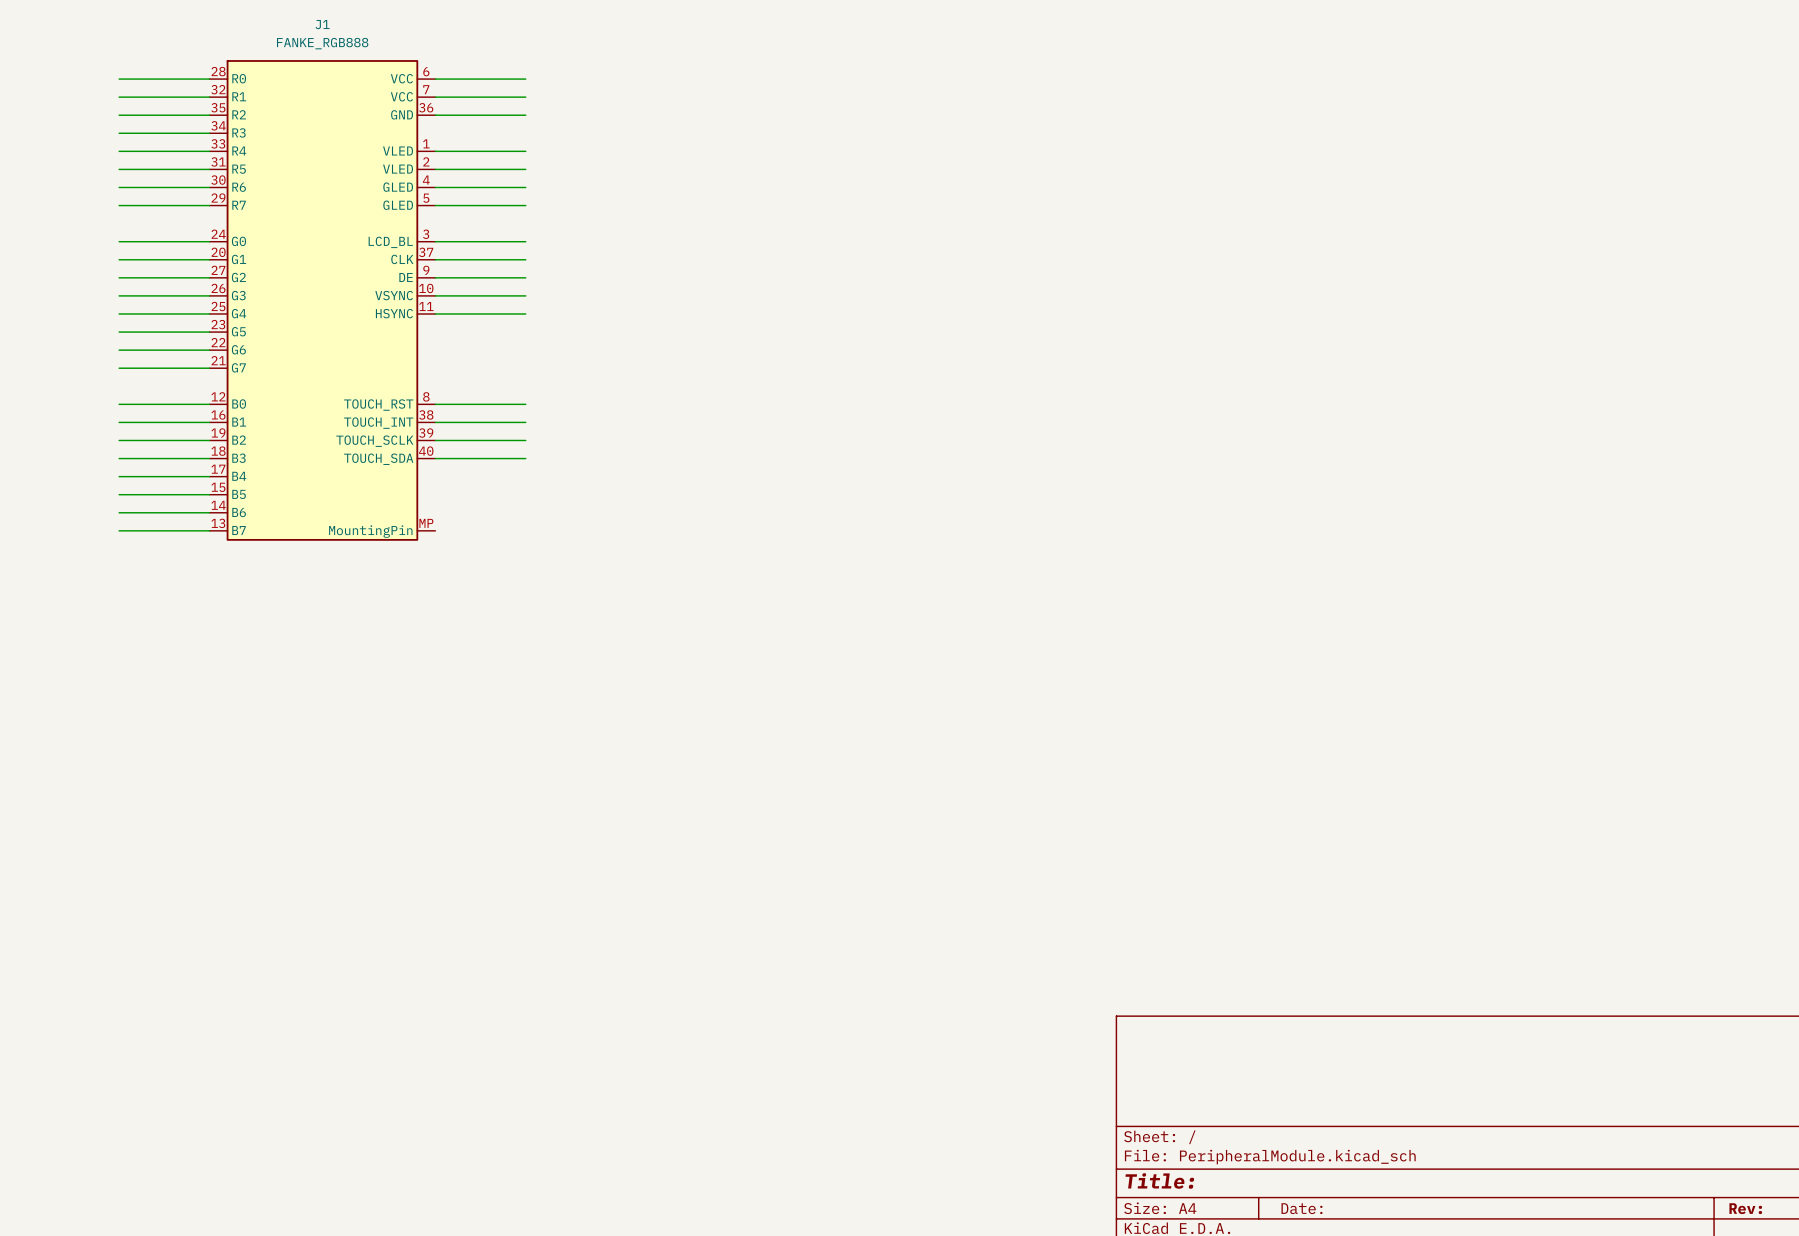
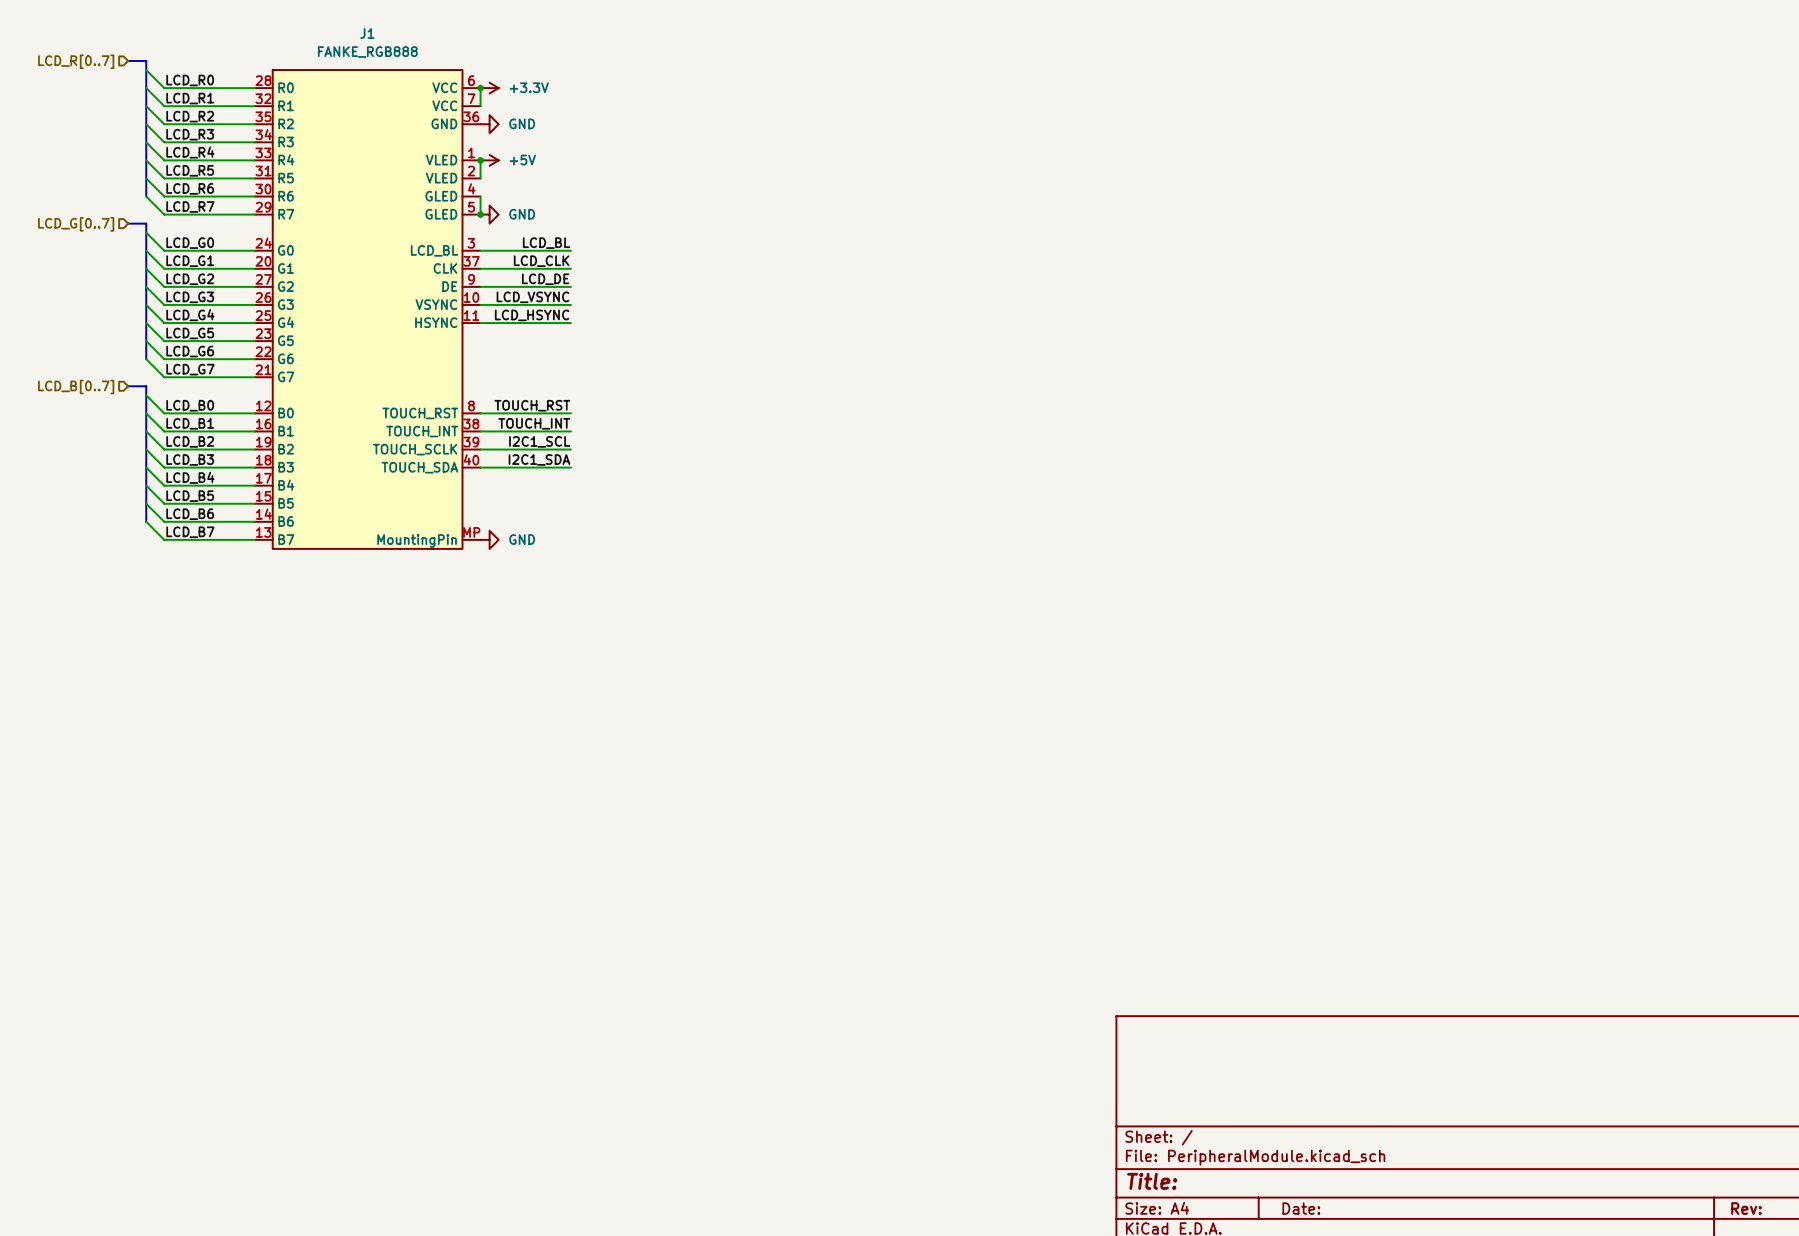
bus: none -> (128, 60) (146, 60) (146, 196)
hierarchical label: none -> LCD_R[0..7] (76, 61)
wire: none -> (146, 70) (164, 88) (254, 88)
wire: (119, 79) (209, 79) -> none
wire: (435, 79) (525, 79) -> none
label: none -> LCD_R0 (190, 80)
wire: none -> (146, 88) (164, 106) (254, 106)
wire: none -> (480, 88) (480, 106)
junction: none -> (480, 88)
power symbol: none -> +3.3V (489, 88)
wire: (119, 97) (209, 97) -> none
wire: (435, 97) (525, 97) -> none
label: none -> LCD_R1 (190, 98)
wire: none -> (146, 106) (164, 124) (254, 124)
wire: (119, 115) (209, 115) -> none
wire: (435, 115) (525, 115) -> none
label: none -> LCD_R2 (190, 116)
wire: none -> (146, 124) (164, 142) (254, 142)
power symbol: none -> GND (489, 124)
wire: (119, 133) (209, 133) -> none
label: none -> LCD_R3 (190, 134)
wire: none -> (146, 142) (164, 160) (254, 160)
wire: (119, 151) (209, 151) -> none
wire: (435, 151) (525, 151) -> none
label: none -> LCD_R4 (190, 152)
wire: none -> (146, 160) (164, 178) (254, 178)
wire: none -> (480, 160) (480, 178)
junction: none -> (480, 160)
power symbol: none -> +5V (489, 160)
wire: (119, 169) (209, 169) -> none
wire: (435, 169) (525, 169) -> none
label: none -> LCD_R5 (190, 170)
wire: none -> (146, 178) (164, 196) (254, 196)
wire: (119, 187) (209, 187) -> none
wire: (435, 187) (525, 187) -> none
label: none -> LCD_R6 (190, 188)
wire: none -> (146, 196) (164, 214) (254, 214)
wire: none -> (480, 196) (480, 214)
wire: (119, 205) (209, 205) -> none
wire: (435, 205) (525, 205) -> none
label: none -> LCD_R7 (190, 206)
junction: none -> (480, 214)
power symbol: none -> GND (489, 214)
hierarchical label: none -> LCD_G[0..7] (76, 224)
bus: none -> (128, 223) (146, 223) (146, 359)
wire: none -> (146, 232) (164, 250) (254, 250)
wire: (119, 241) (209, 241) -> none
wire: (435, 241) (525, 241) -> (480, 250) (570, 250)
label: none -> LCD_G0 (190, 243)
label: none -> LCD_BL (546, 243)
wire: none -> (146, 250) (164, 268) (254, 268)
wire: (119, 259) (209, 259) -> none
wire: (435, 259) (525, 259) -> (480, 268) (570, 268)
label: none -> LCD_G1 (190, 261)
label: none -> LCD_CLK (541, 261)
wire: none -> (146, 268) (164, 286) (254, 286)
wire: (119, 277) (209, 277) -> none
wire: (435, 277) (525, 277) -> (480, 286) (570, 286)
label: none -> LCD_G2 (190, 279)
label: none -> LCD_DE (545, 279)
wire: none -> (146, 286) (164, 304) (254, 304)
wire: (119, 295) (209, 295) -> none
wire: (435, 295) (525, 295) -> (480, 304) (570, 304)
label: none -> LCD_G3 (190, 297)
label: none -> LCD_VSYNC (532, 297)
J1 position: (322, 300) -> (367, 309)
wire: none -> (146, 304) (164, 323) (254, 323)
wire: (119, 313) (209, 313) -> none
wire: (435, 313) (525, 313) -> (480, 323) (570, 323)
label: none -> LCD_G4 (190, 315)
label: none -> LCD_HSYNC (532, 315)
wire: none -> (146, 323) (164, 341) (254, 341)
wire: (119, 332) (209, 332) -> none
label: none -> LCD_G5 (190, 333)
wire: none -> (146, 341) (164, 359) (254, 359)
wire: (119, 350) (209, 350) -> none
label: none -> LCD_G6 (190, 351)
wire: none -> (146, 359) (164, 377) (254, 377)
wire: (119, 368) (209, 368) -> none
label: none -> LCD_G7 (190, 369)
hierarchical label: none -> LCD_B[0..7] (76, 387)
bus: none -> (128, 386) (146, 386) (146, 521)
wire: none -> (146, 395) (164, 413) (254, 413)
wire: (119, 404) (209, 404) -> none
wire: (435, 404) (525, 404) -> (480, 413) (570, 413)
label: none -> LCD_B0 (190, 405)
label: none -> TOUCH_RST (532, 405)
wire: none -> (146, 413) (164, 431) (254, 431)
wire: (119, 422) (209, 422) -> none
wire: (435, 422) (525, 422) -> (480, 431) (570, 431)
label: none -> LCD_B1 (190, 423)
label: none -> TOUCH_INT (534, 423)
wire: none -> (146, 431) (164, 449) (254, 449)
wire: (119, 440) (209, 440) -> none
wire: (435, 440) (525, 440) -> (480, 449) (570, 449)
label: none -> LCD_B2 (190, 441)
label: none -> I2C1_SCL (539, 441)
wire: none -> (146, 449) (164, 467) (254, 467)
wire: (119, 458) (209, 458) -> none
wire: (435, 458) (525, 458) -> (480, 467) (570, 467)
label: none -> LCD_B3 (190, 459)
label: none -> I2C1_SDA (539, 459)
wire: none -> (146, 467) (164, 485) (254, 485)
wire: (119, 476) (209, 476) -> none
label: none -> LCD_B4 (190, 477)
wire: none -> (146, 485) (164, 503) (254, 503)
wire: (119, 494) (209, 494) -> none
label: none -> LCD_B5 (190, 496)
wire: none -> (146, 503) (164, 521) (254, 521)
wire: (119, 512) (209, 512) -> none
label: none -> LCD_B6 (190, 514)
wire: none -> (146, 521) (164, 539) (254, 539)
wire: (119, 530) (209, 530) -> none
label: none -> LCD_B7 (190, 532)
power symbol: none -> GND (489, 539)

